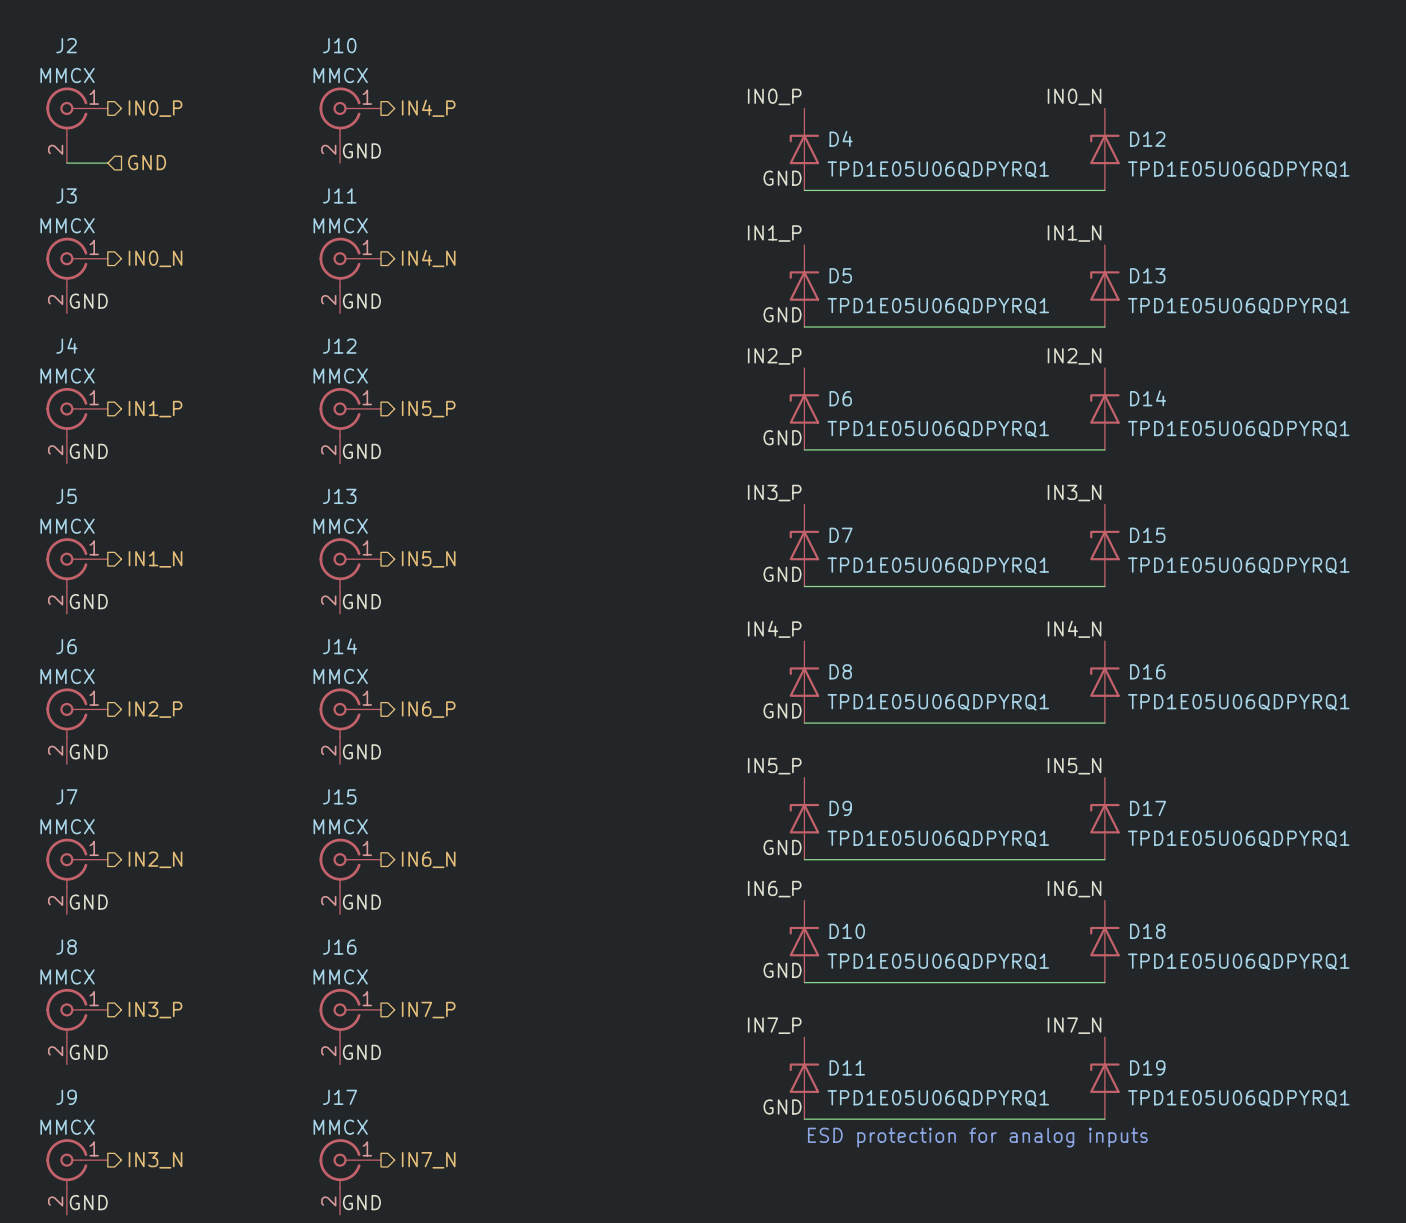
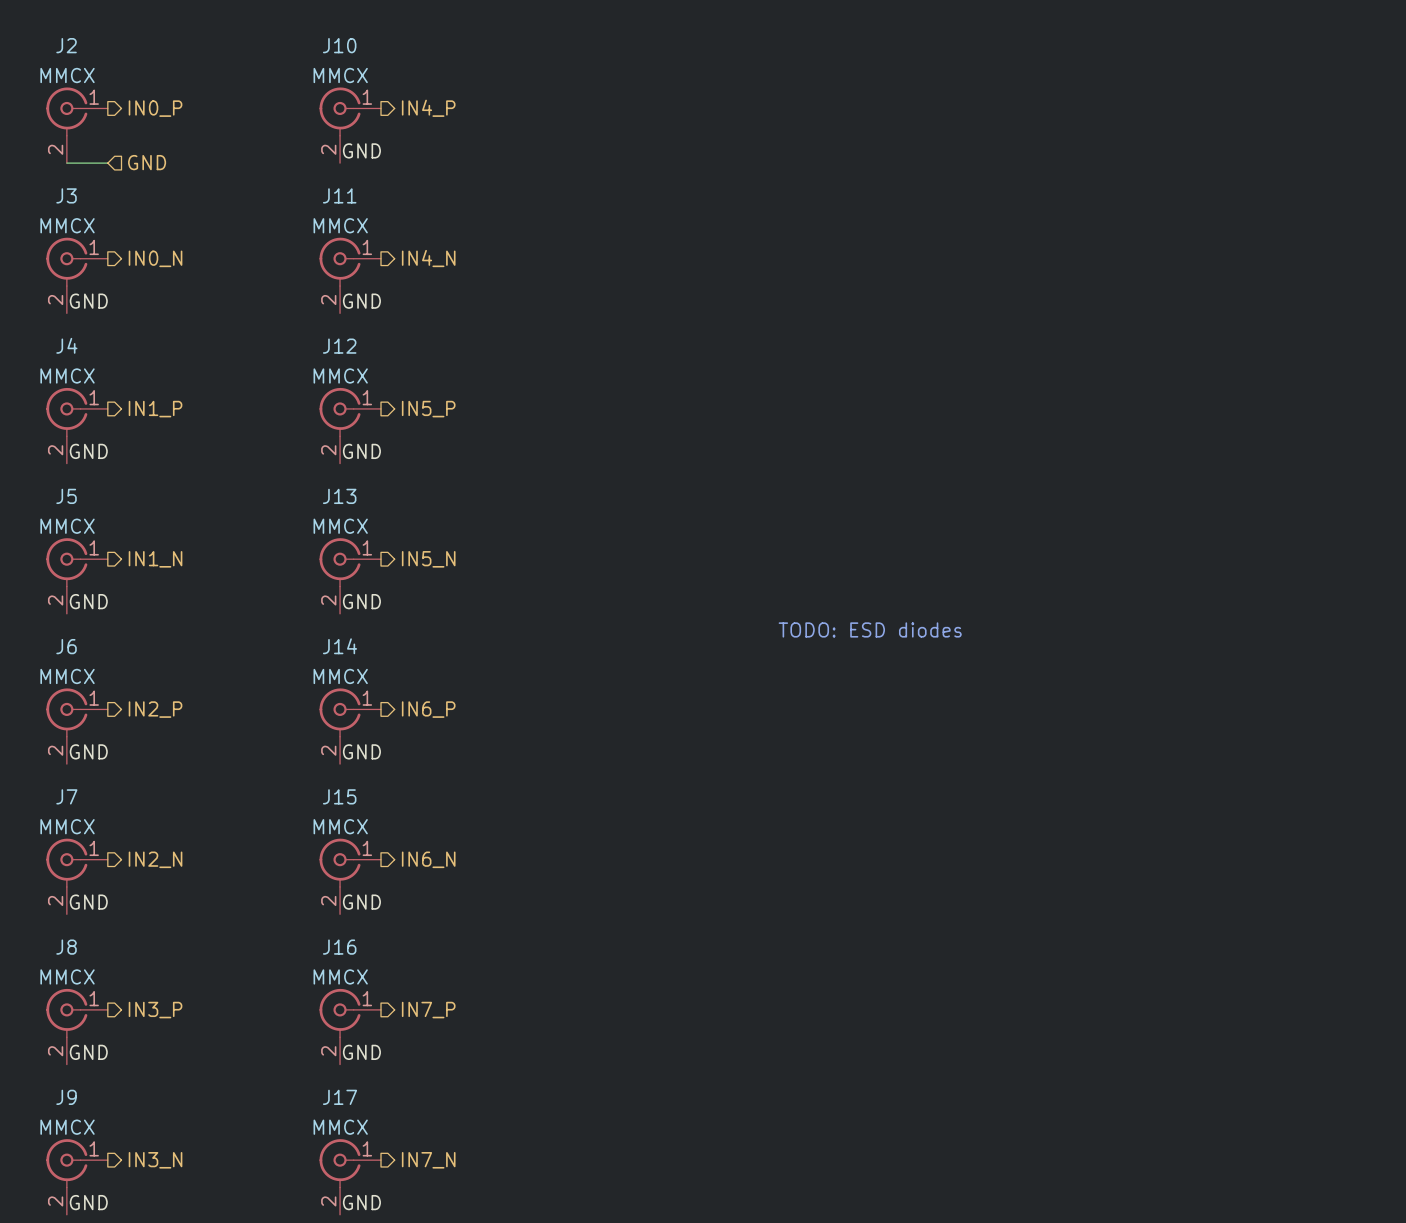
label: IN0_P (774, 96) -> none
label: IN0_N (1074, 96) -> none
D4: TPD1E05U06QDPYRQ1 (804, 149) -> none
D12: TPD1E05U06QDPYRQ1 (1104, 149) -> none
label: GND (782, 178) -> none
wire: (804, 190) (1104, 190) -> none
label: IN1_P (774, 233) -> none
label: IN1_N (1074, 233) -> none
D5: TPD1E05U06QDPYRQ1 (804, 286) -> none
D13: TPD1E05U06QDPYRQ1 (1104, 286) -> none
label: GND (782, 314) -> none
wire: (804, 327) (1104, 327) -> none
label: IN2_P (774, 356) -> none
label: IN2_N (1074, 356) -> none
D6: TPD1E05U06QDPYRQ1 (804, 408) -> none
D14: TPD1E05U06QDPYRQ1 (1104, 408) -> none
label: GND (782, 437) -> none
wire: (804, 449) (1104, 449) -> none
label: IN3_P (774, 493) -> none
label: IN3_N (1074, 493) -> none
D7: TPD1E05U06QDPYRQ1 (804, 545) -> none
D15: TPD1E05U06QDPYRQ1 (1104, 545) -> none
label: GND (782, 574) -> none
wire: (804, 586) (1104, 586) -> none
label: IN4_P (774, 629) -> none
text: none -> TODO: ESD diodes (870, 629)
label: IN4_N (1074, 629) -> none
D8: TPD1E05U06QDPYRQ1 (804, 682) -> none
D16: TPD1E05U06QDPYRQ1 (1104, 682) -> none
label: GND (782, 710) -> none
wire: (804, 723) (1104, 723) -> none
label: IN5_P (774, 766) -> none
label: IN5_N (1074, 766) -> none
D9: TPD1E05U06QDPYRQ1 (804, 818) -> none
D17: TPD1E05U06QDPYRQ1 (1104, 818) -> none
label: GND (782, 847) -> none
wire: (804, 859) (1104, 859) -> none
label: IN6_P (774, 889) -> none
label: IN6_N (1074, 889) -> none
D10: TPD1E05U06QDPYRQ1 (804, 941) -> none
D18: TPD1E05U06QDPYRQ1 (1104, 941) -> none
label: GND (782, 970) -> none
wire: (804, 982) (1104, 982) -> none
label: IN7_P (774, 1025) -> none
label: IN7_N (1074, 1025) -> none
D11: TPD1E05U06QDPYRQ1 (804, 1078) -> none
D19: TPD1E05U06QDPYRQ1 (1104, 1078) -> none
label: GND (782, 1106) -> none
wire: (804, 1119) (1104, 1119) -> none
text: ESD protection for analog inputs (977, 1137) -> none

